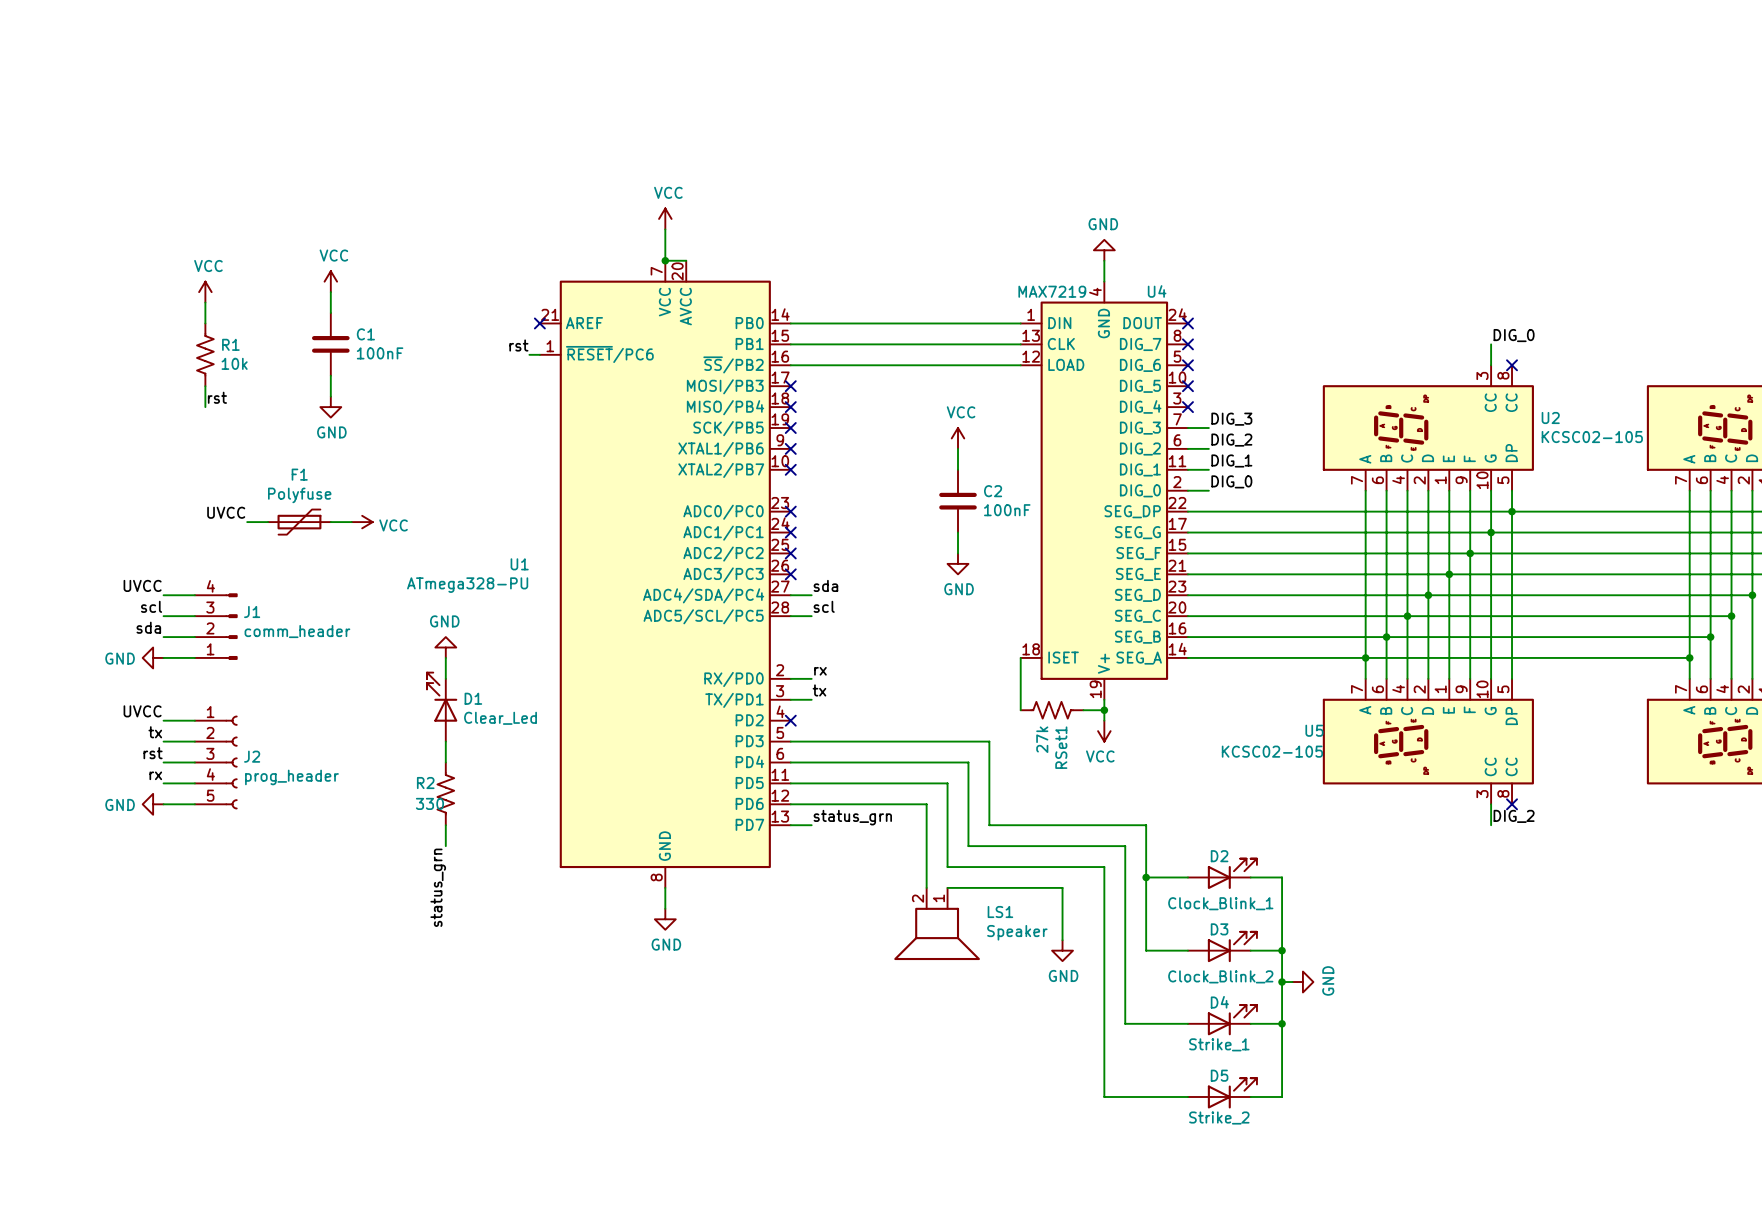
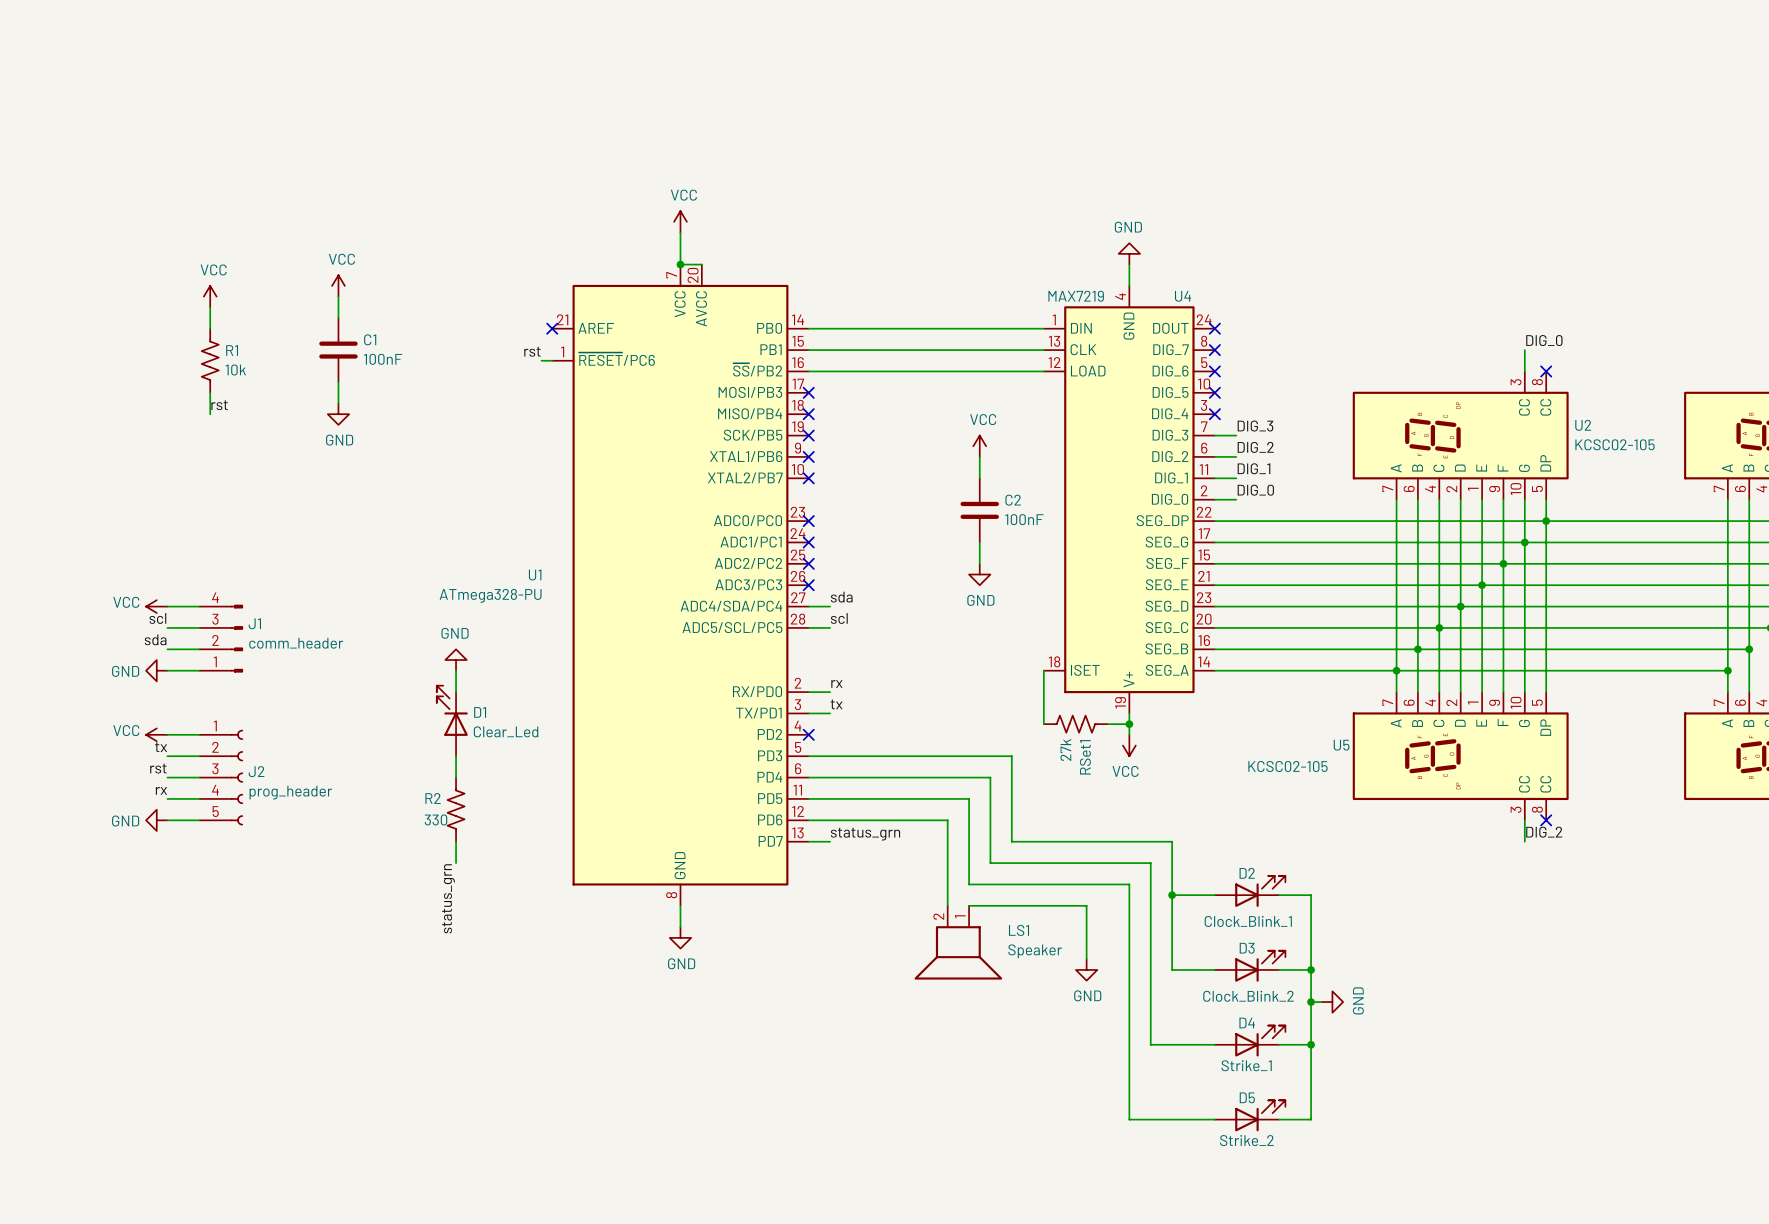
label: UVCC (226, 512) -> none
wire: (247, 522) (268, 522) -> none
F1: Polyfuse (299, 522) -> none
wire: (330, 522) (351, 522) -> none
power symbol: VCC (362, 522) -> none
label: UVCC (142, 585) -> none
power symbol: none -> VCC (156, 606)
label: UVCC (142, 711) -> none
power symbol: none -> VCC (156, 734)

